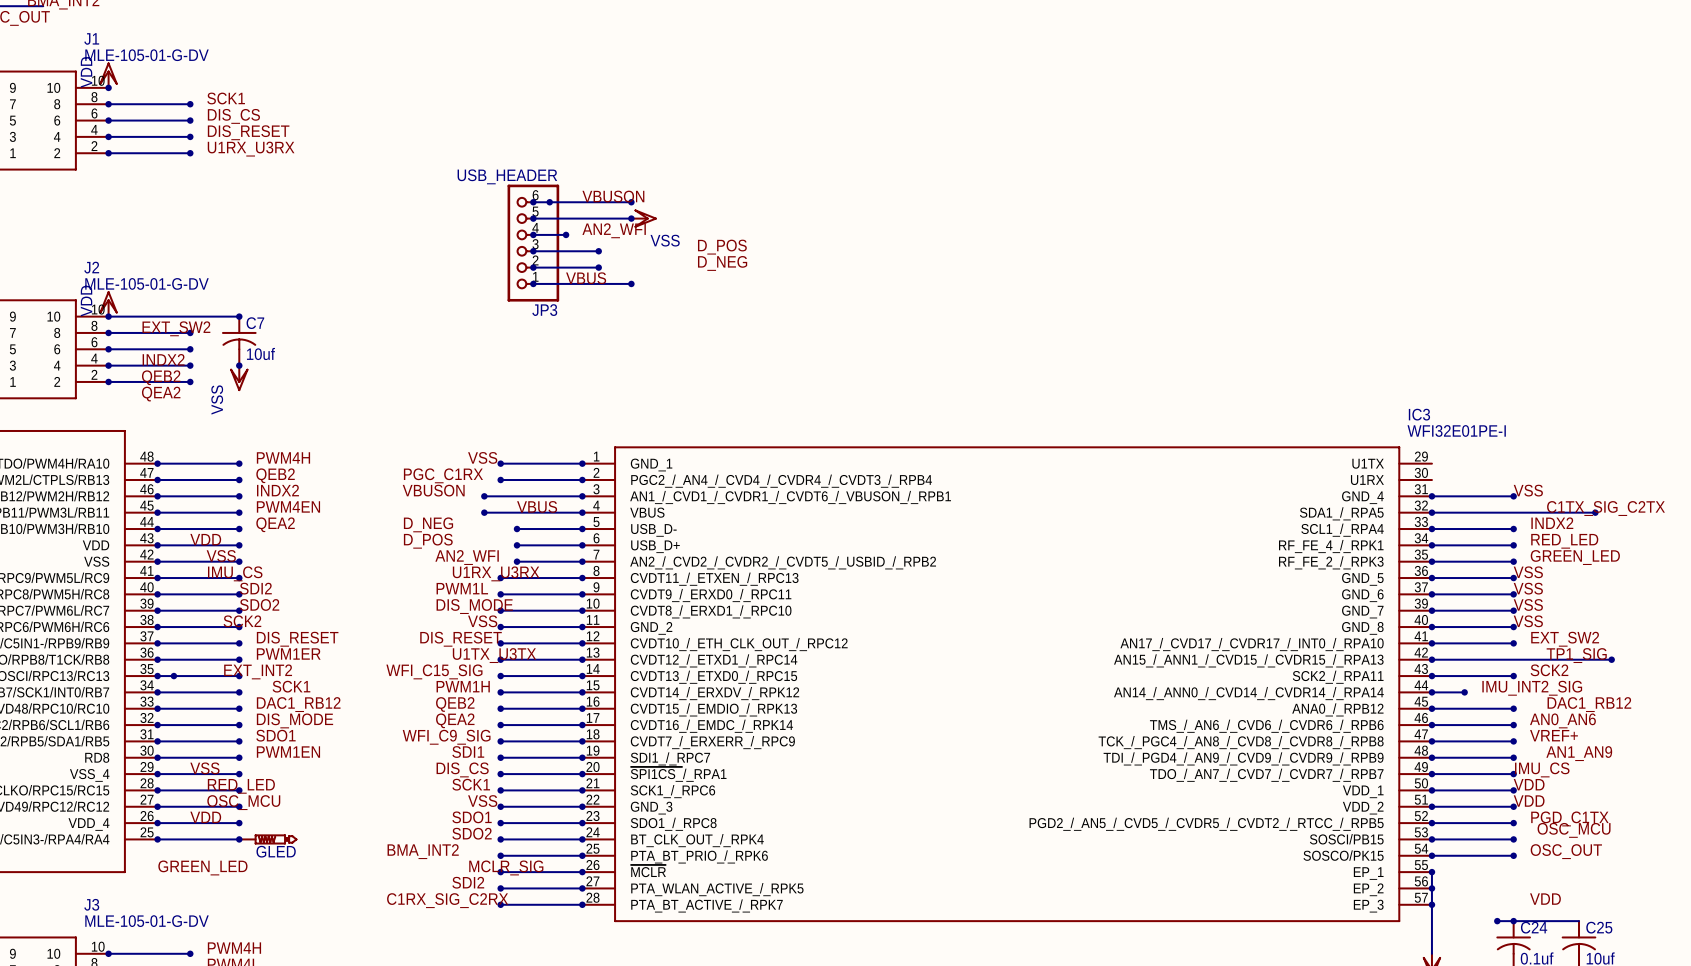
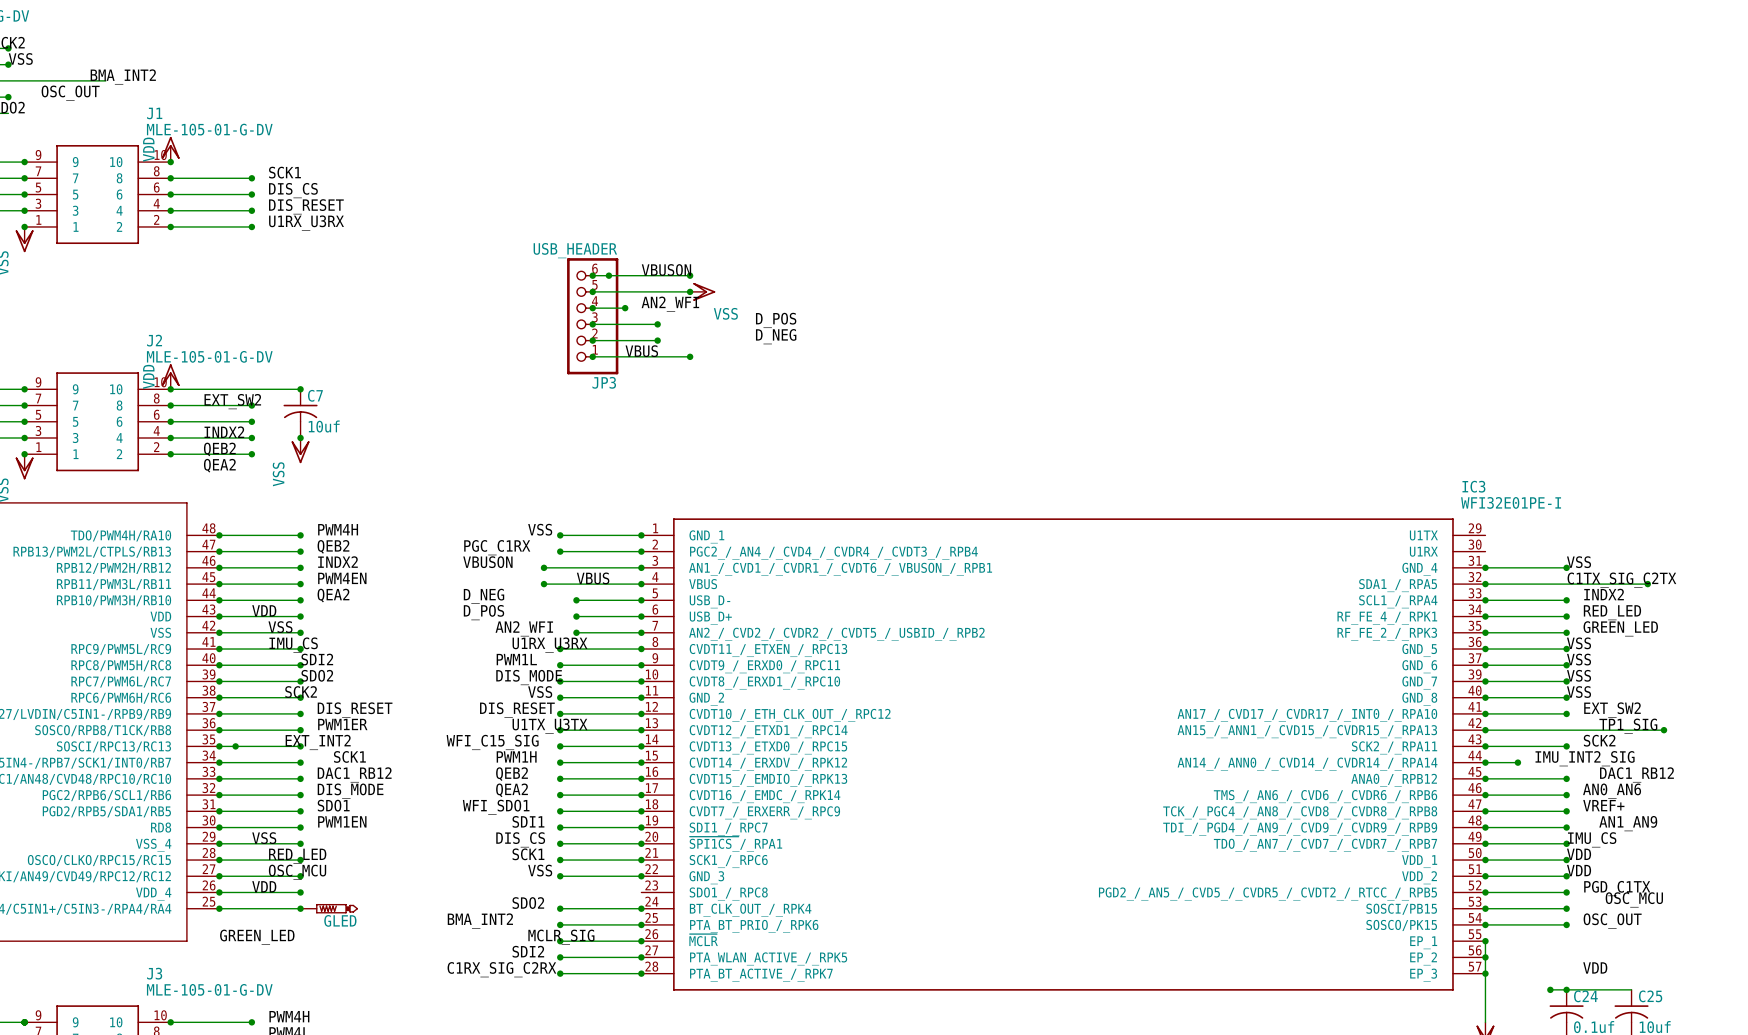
label position: C1TX_SIG_C2TX (1606, 508) -> C1TX_SIG_C2TX (1621, 580)
label: WFI_C9_SIG (446, 737) -> WFI_SDO1 (496, 807)
label: SDO1 (472, 817) -> none
wire: (500, 823) (582, 823) -> none
junction: (500, 823) -> none
junction: (582, 823) -> none

